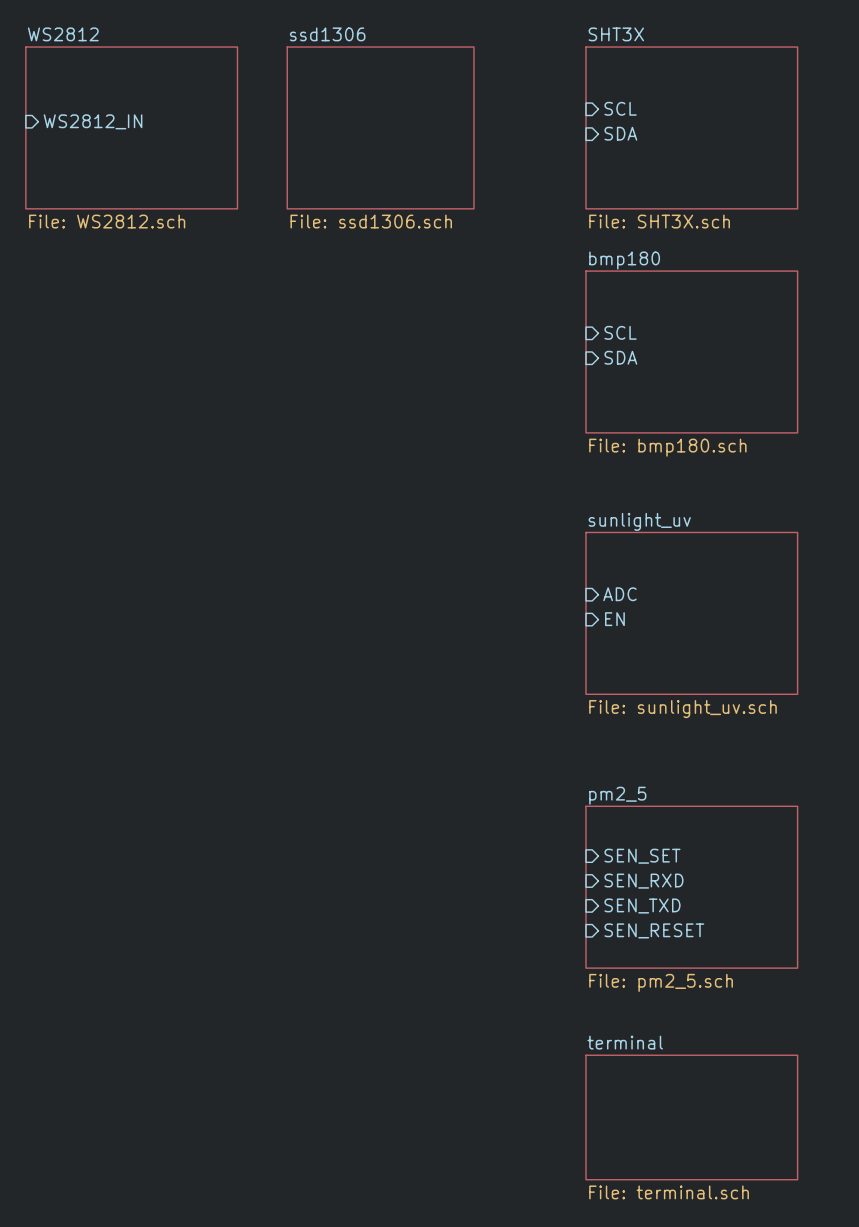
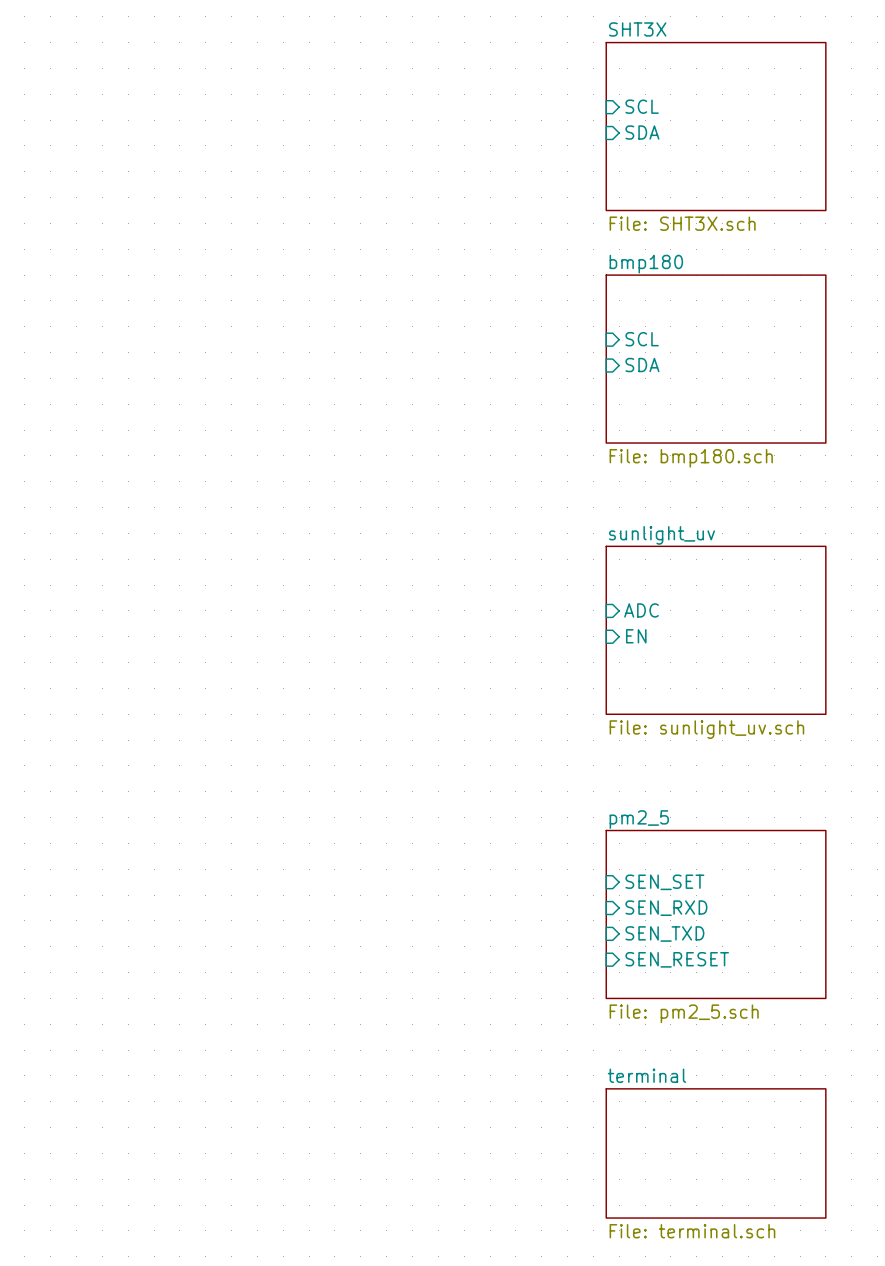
sheet pin: WS2812_IN (93, 121) -> none
sheet WS2812: File: WS2812.sch (131, 127) -> none
sheet ssd1306: File: ssd1306.sch (380, 127) -> none

